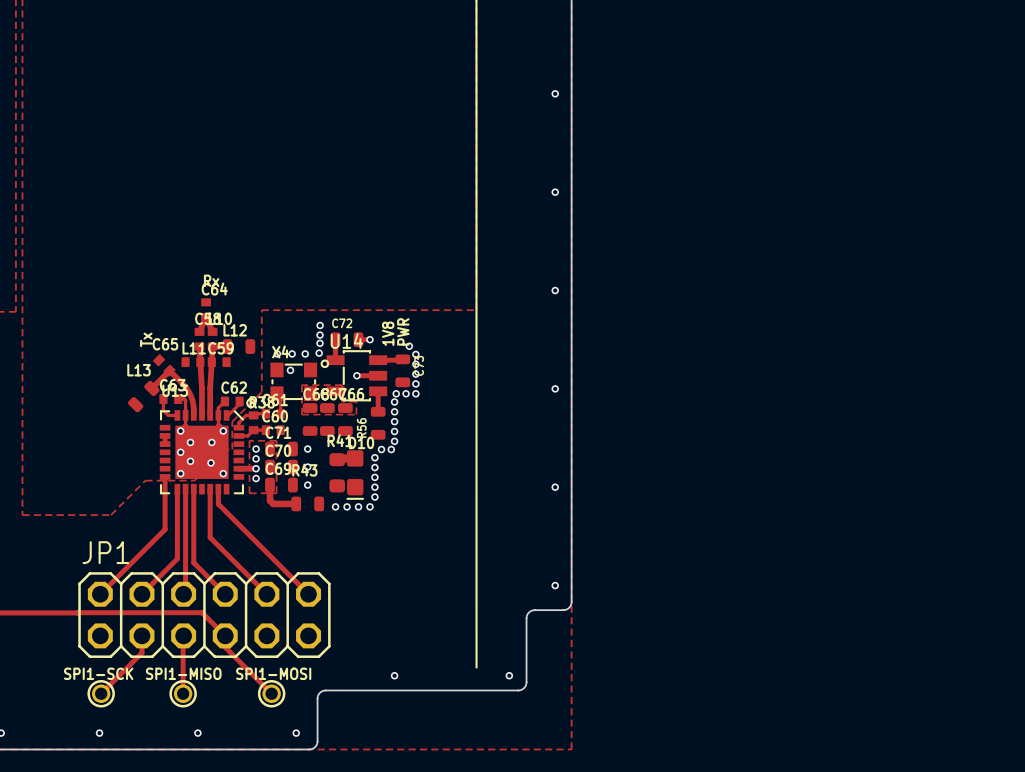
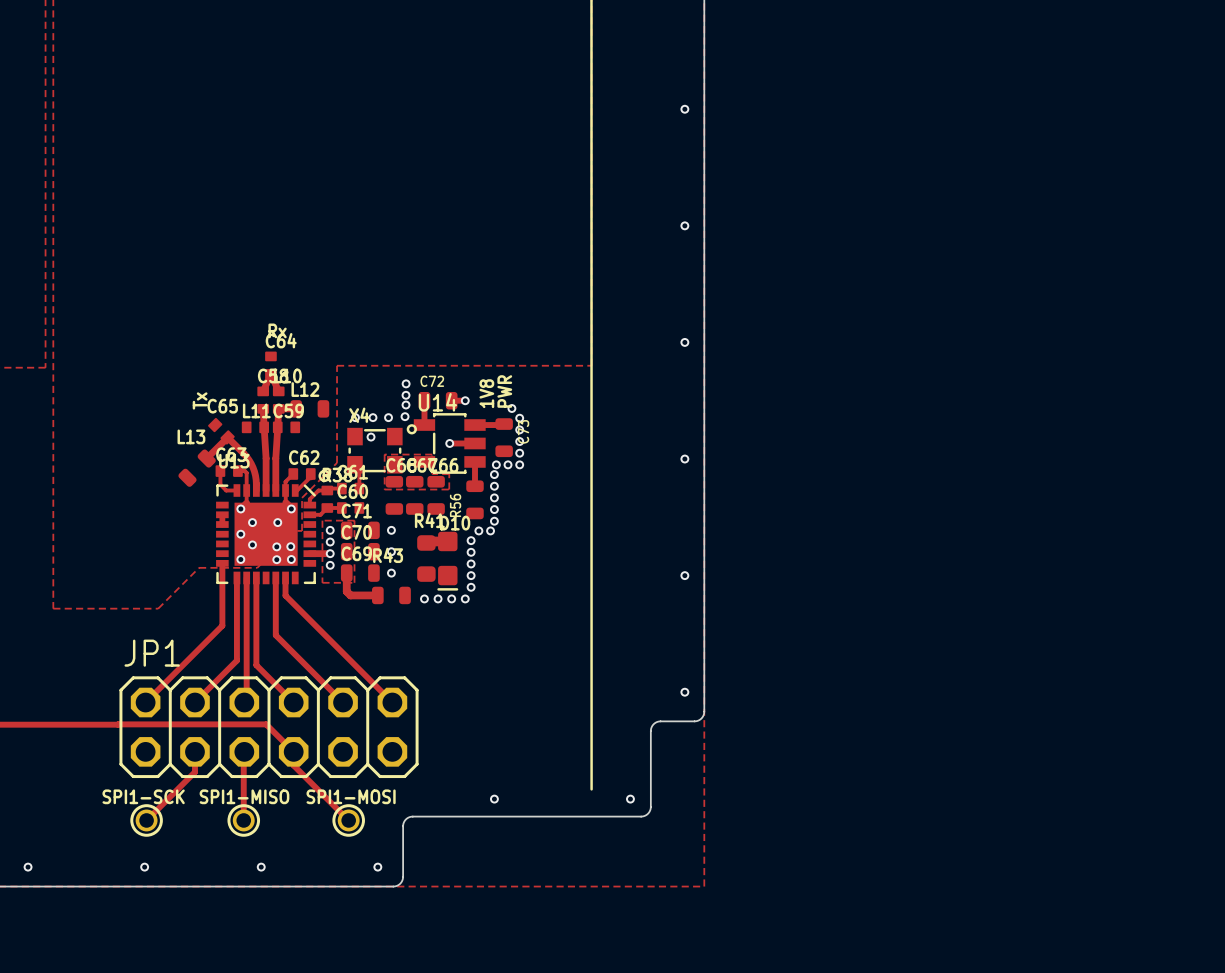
via: none -> (290, 546)
via: none -> (276, 559)

